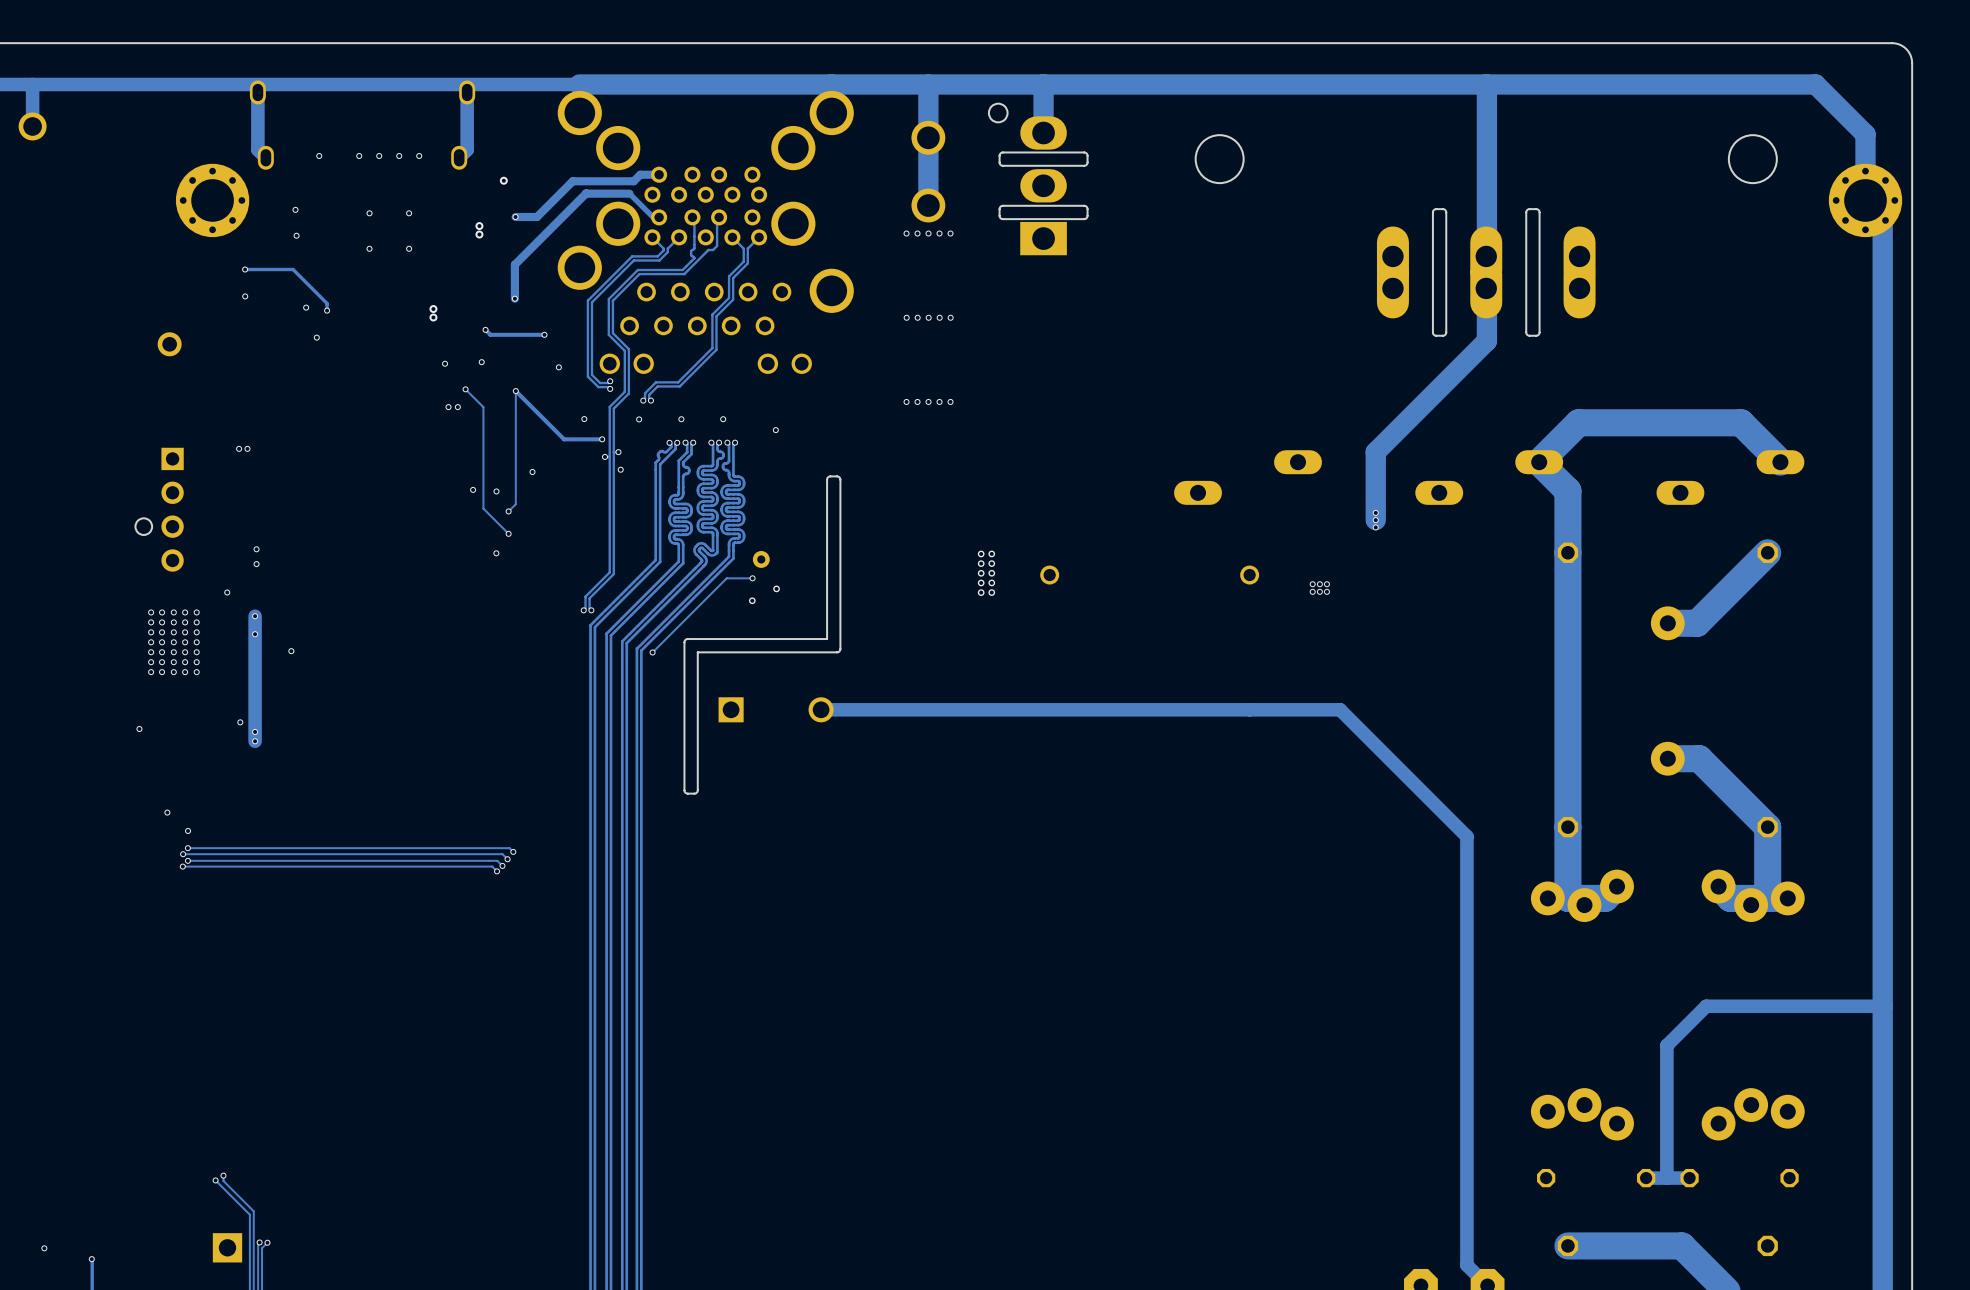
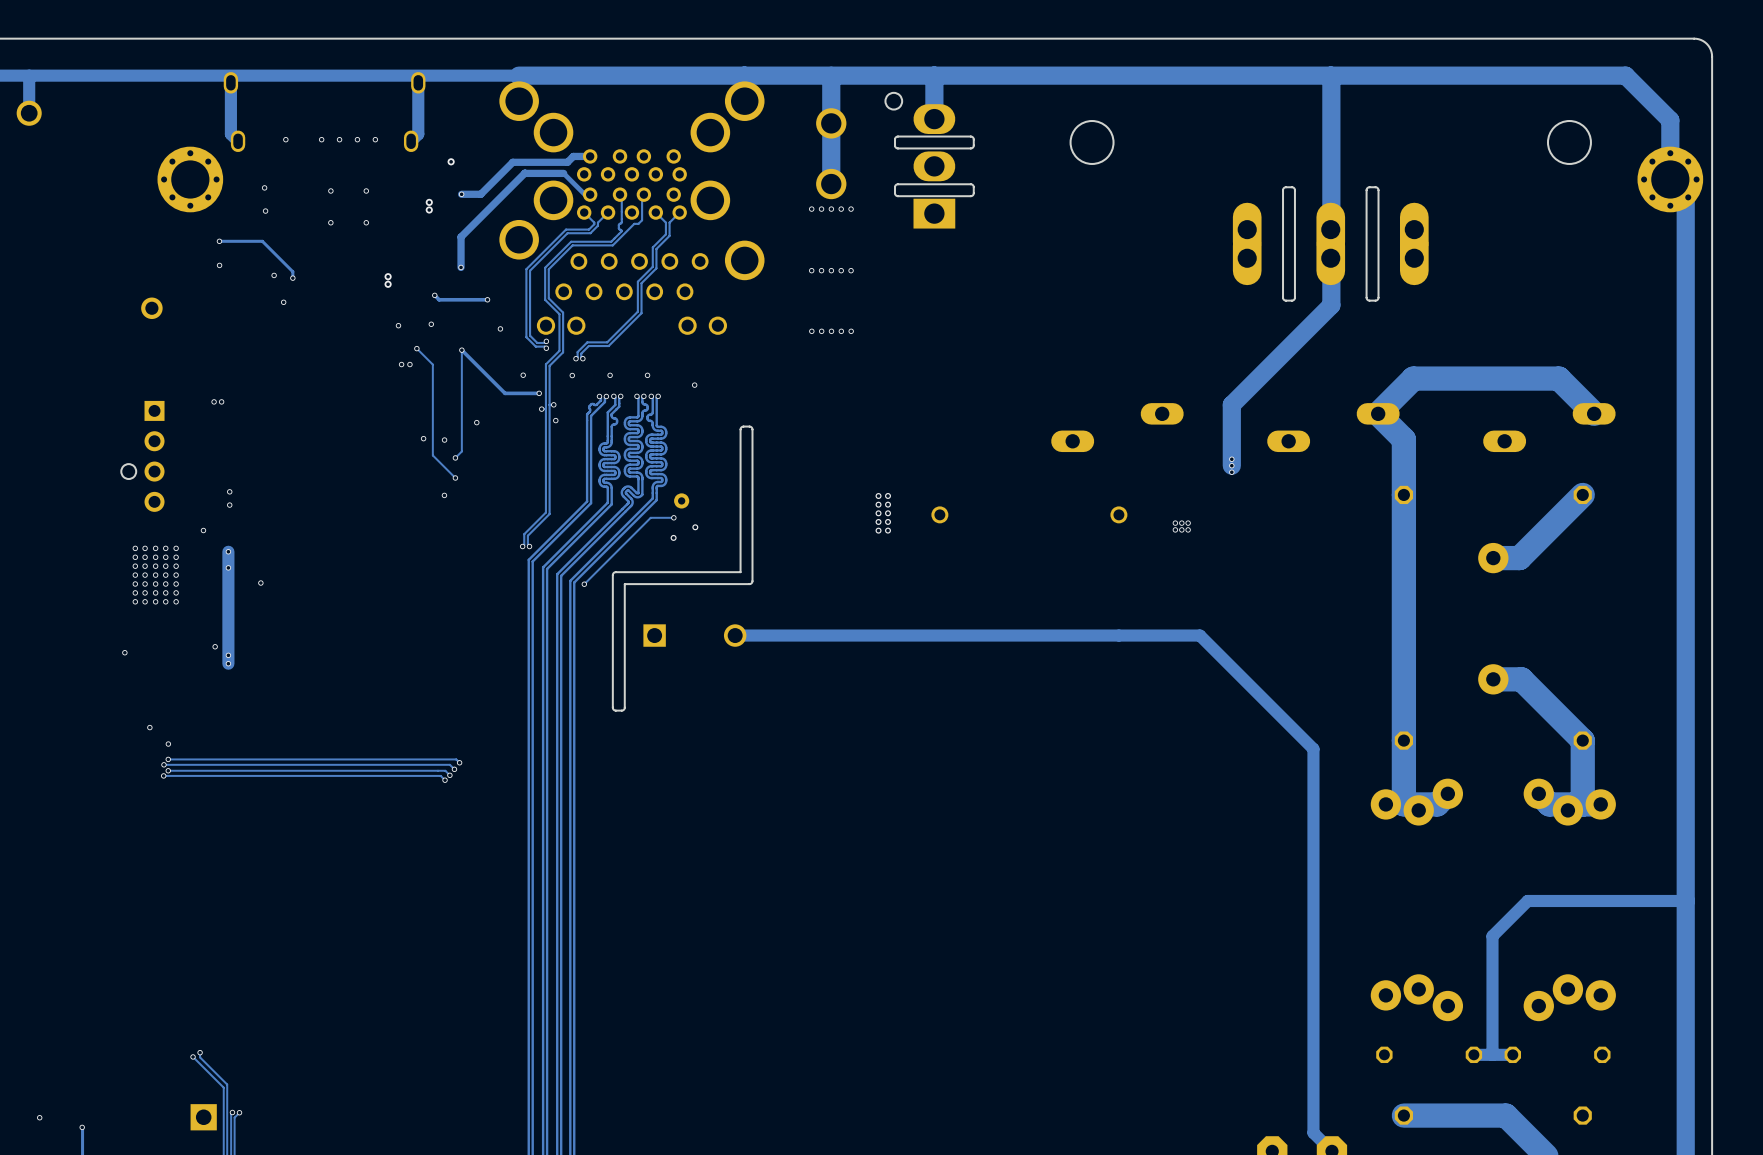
via: none -> (811, 270)
via: none -> (821, 270)
via: none -> (831, 270)
via: none -> (841, 270)
via: none -> (851, 270)
via: (906, 317) -> none
via: (917, 317) -> none
via: (928, 317) -> none
via: (939, 317) -> none
via: (950, 317) -> none
via: none -> (811, 331)
via: none -> (821, 331)
via: none -> (831, 331)
via: none -> (841, 331)
via: none -> (851, 331)
via: (906, 401) -> none
via: (917, 401) -> none
via: (928, 401) -> none
via: (939, 401) -> none
via: (950, 401) -> none

